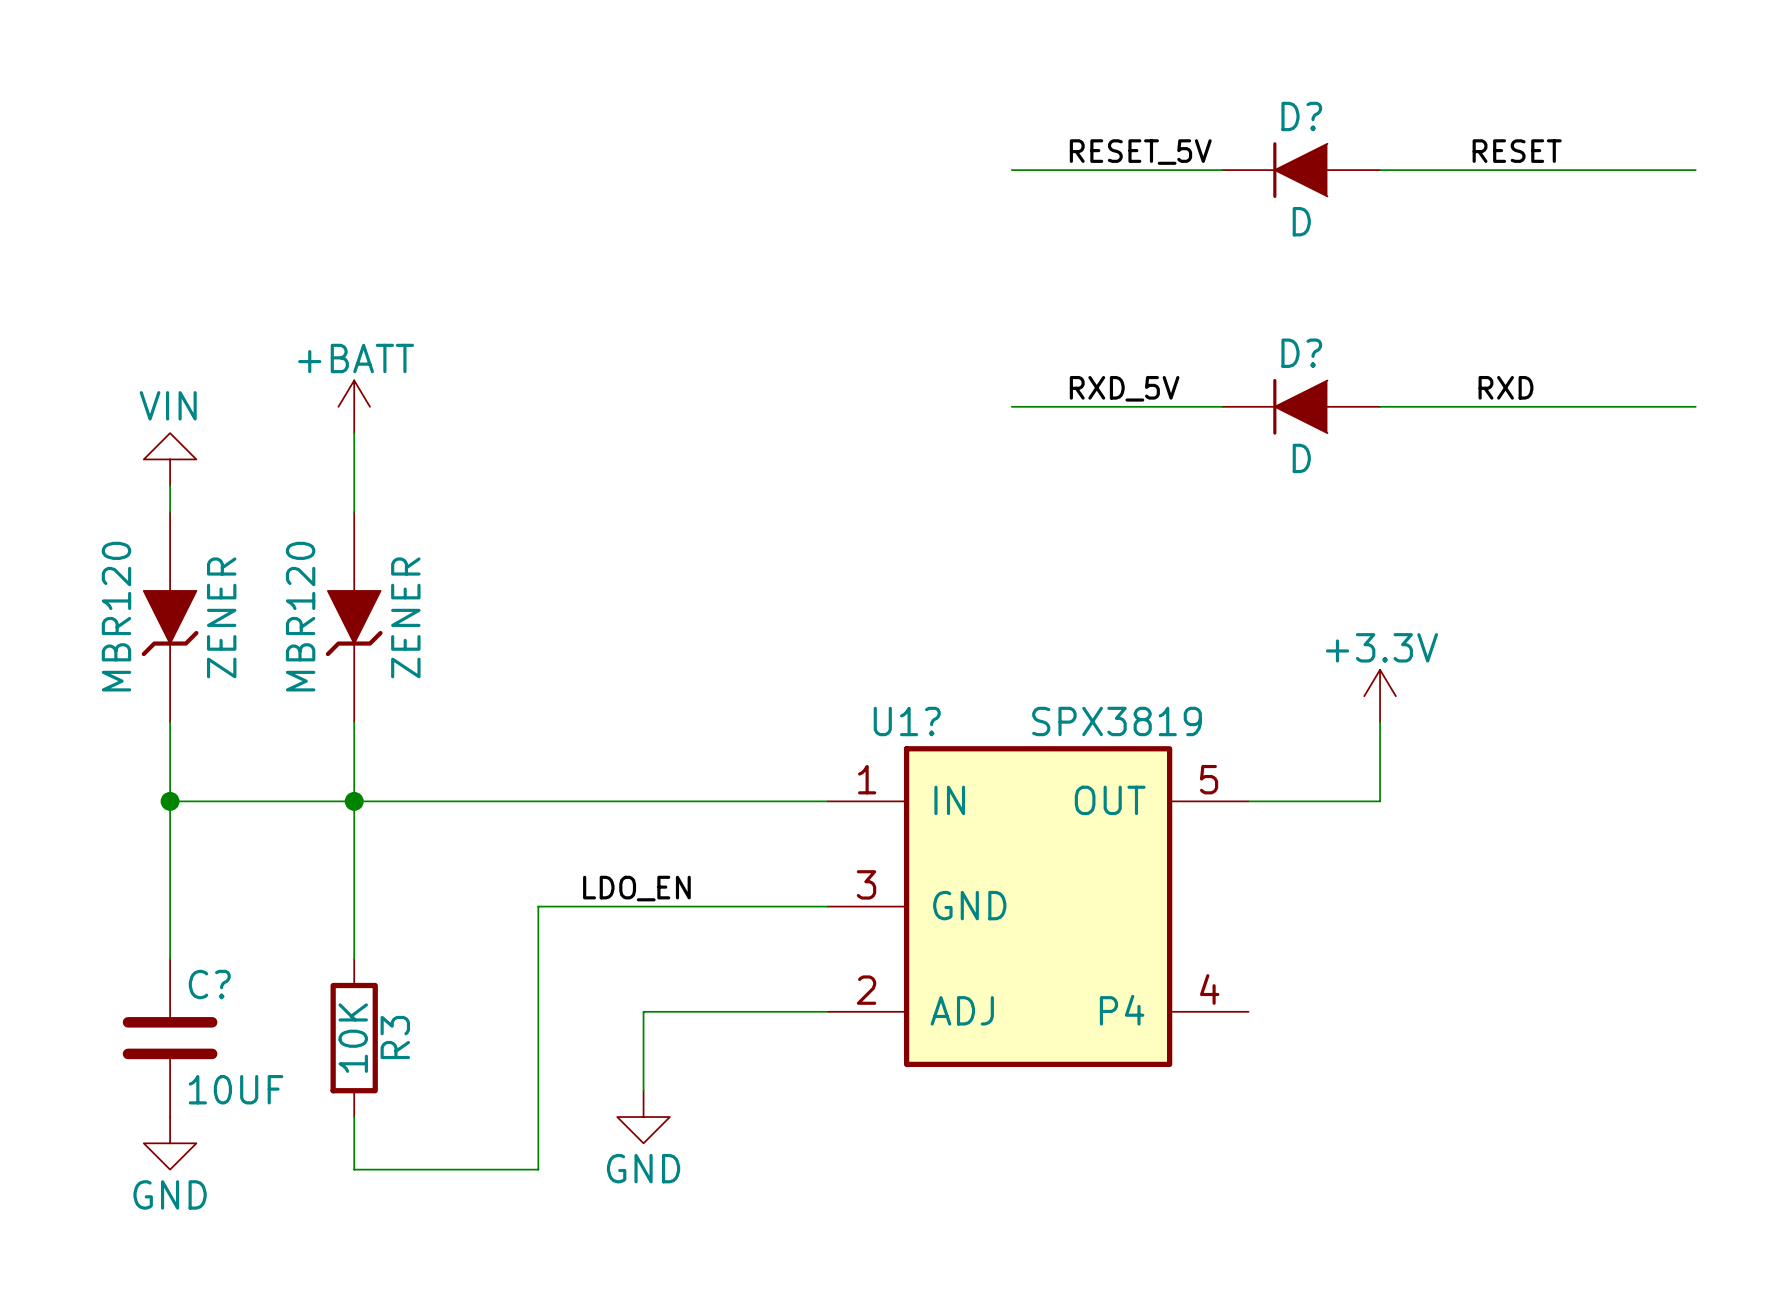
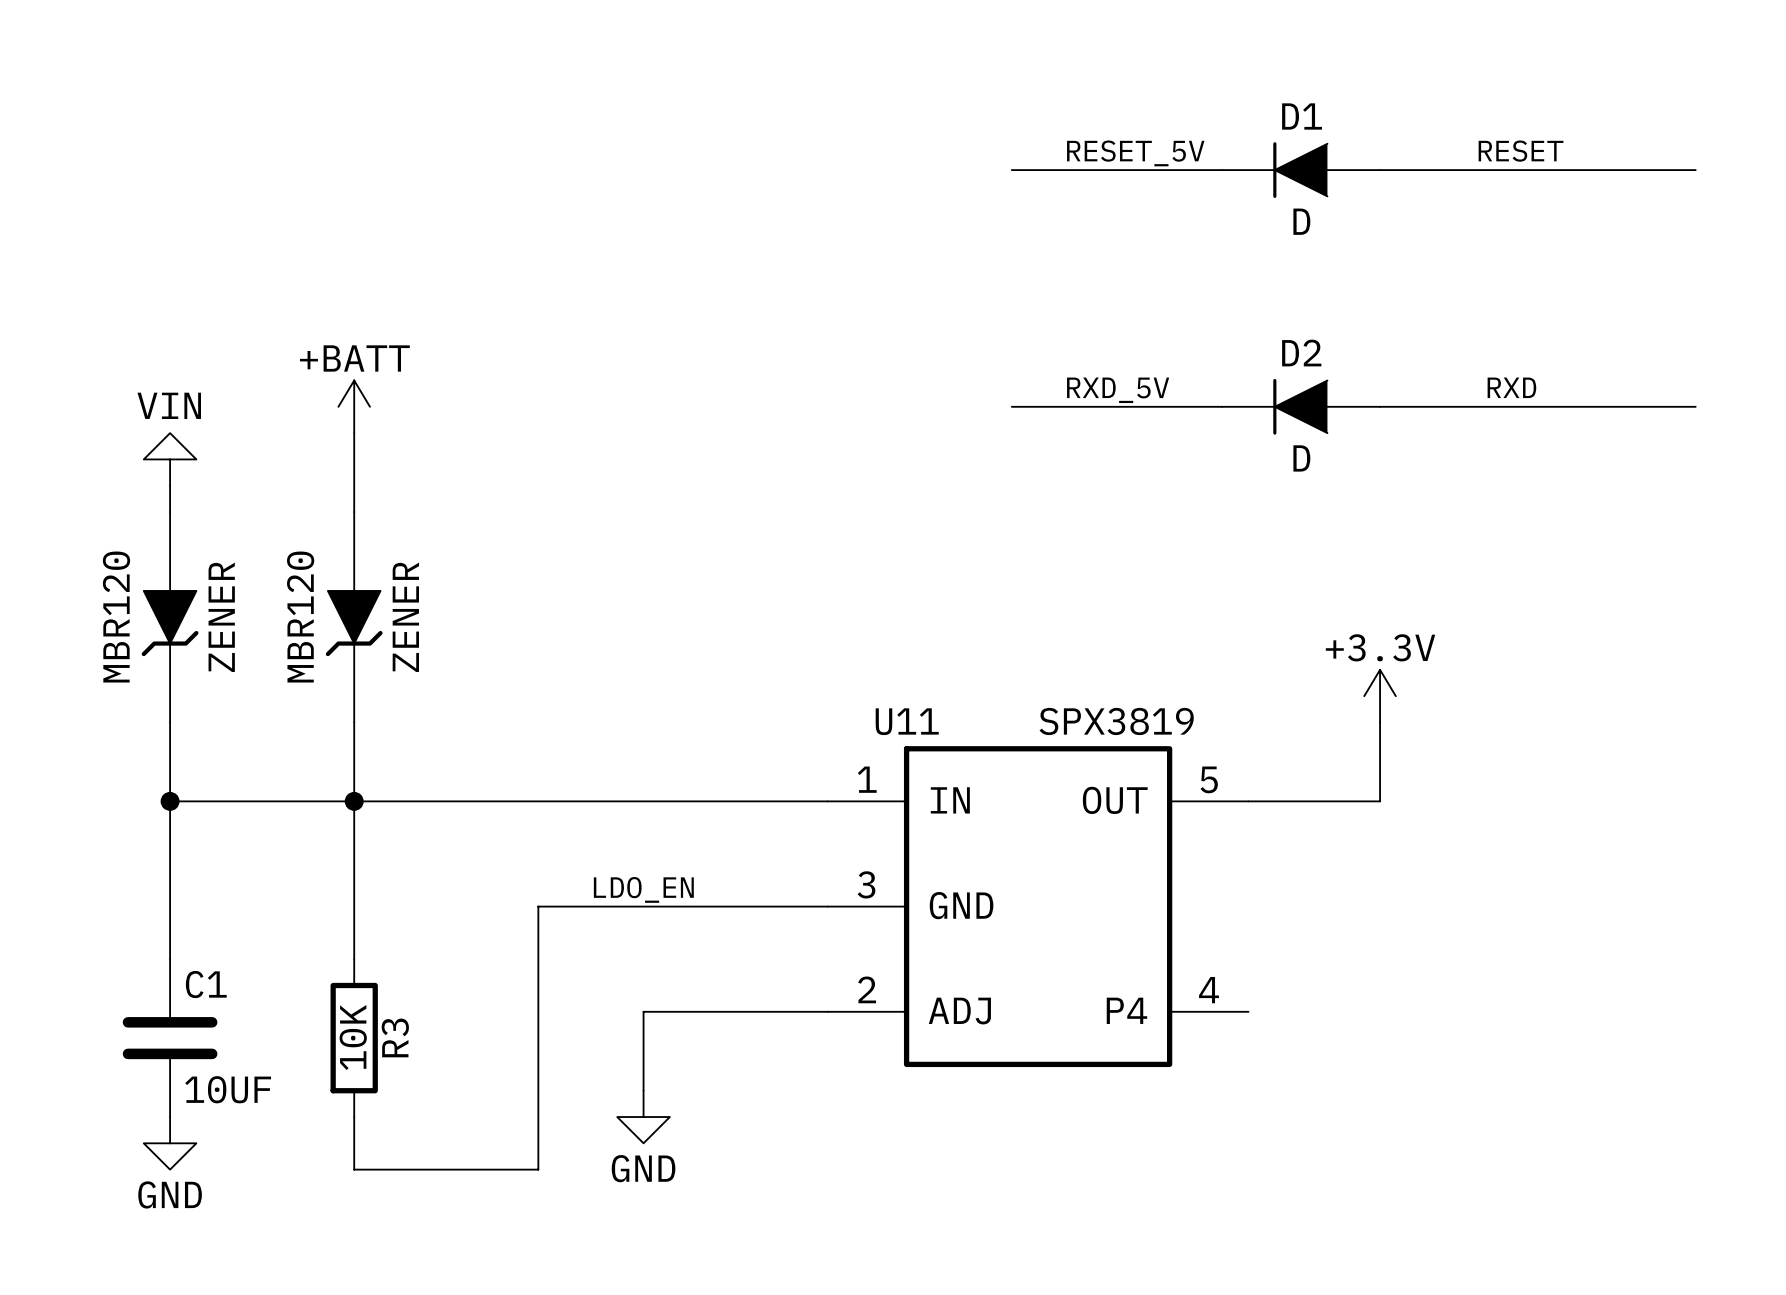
D? name: D? (1301, 116) -> D1 (1302, 116)
D? name: D? (1301, 353) -> D2 (1301, 353)
U1? name: U1? (907, 721) -> U11 (907, 721)
C? name: C? (209, 984) -> C1 (206, 984)

